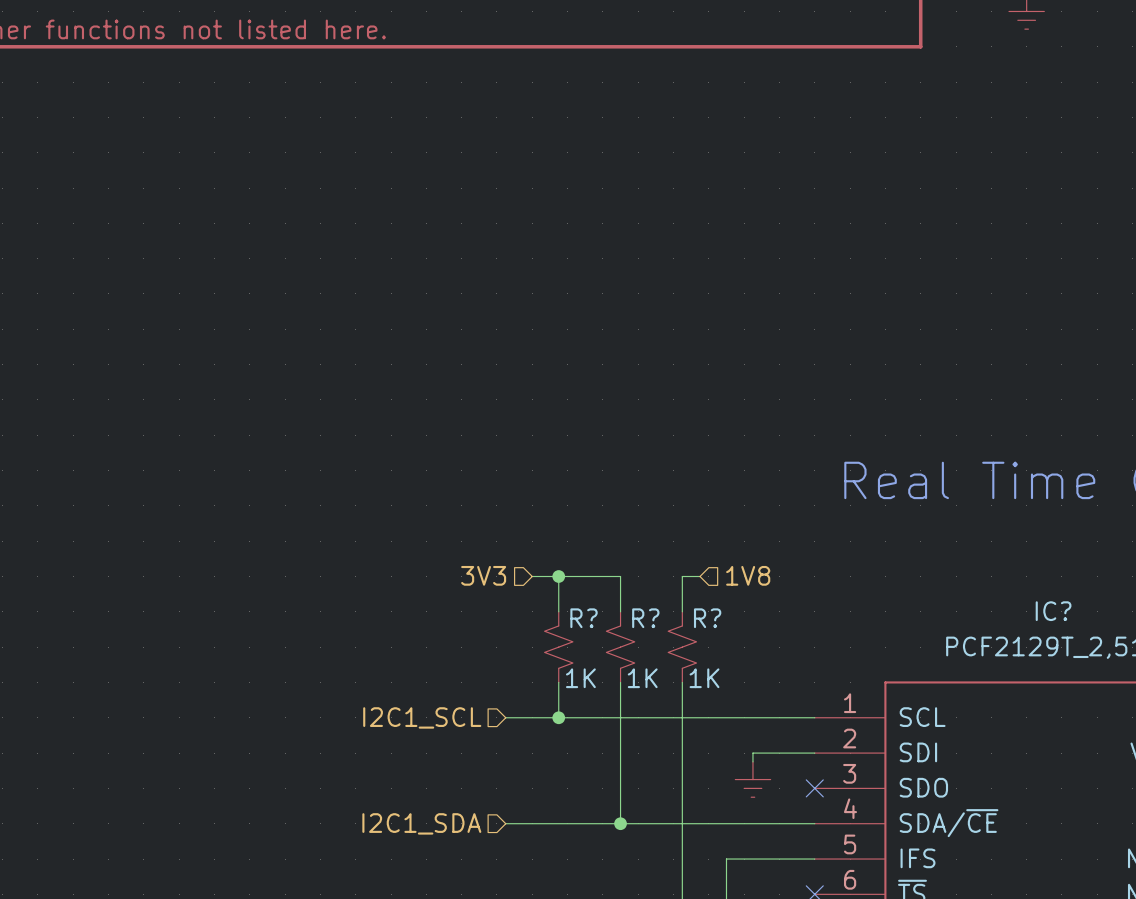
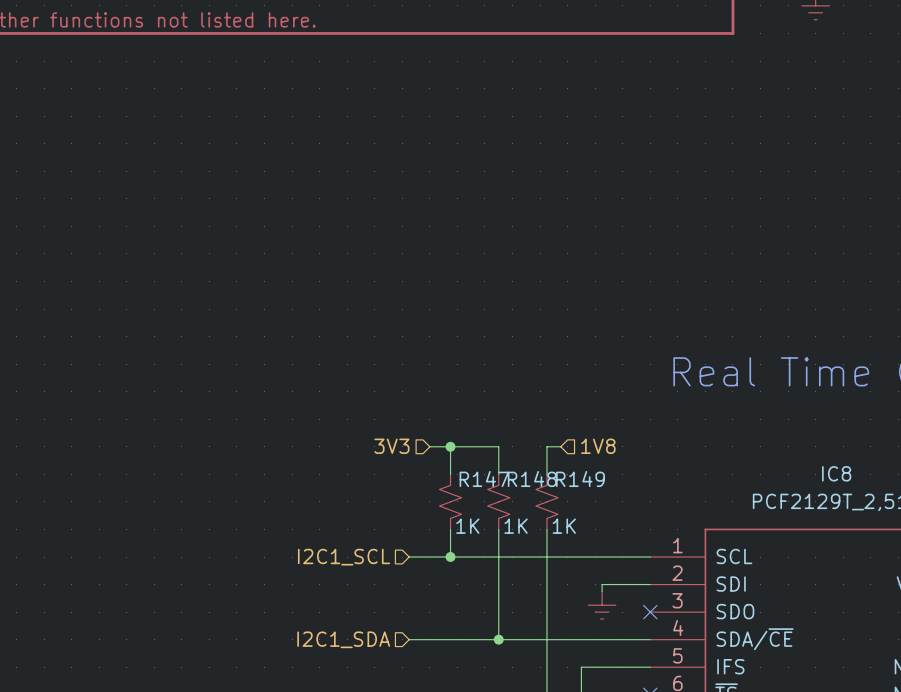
IC? name: IC? (1053, 611) -> IC8 (836, 473)
R? name: R? (584, 618) -> R147 (484, 479)
R? name: R? (645, 618) -> R148 (532, 479)
R? name: R? (707, 618) -> R149 (580, 479)

